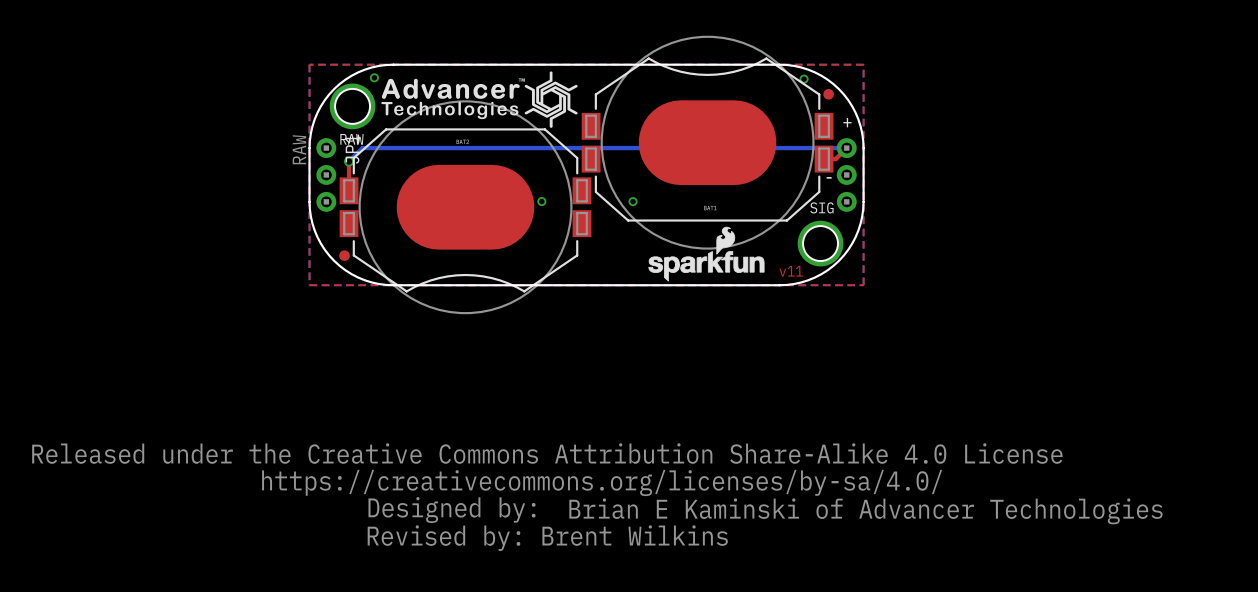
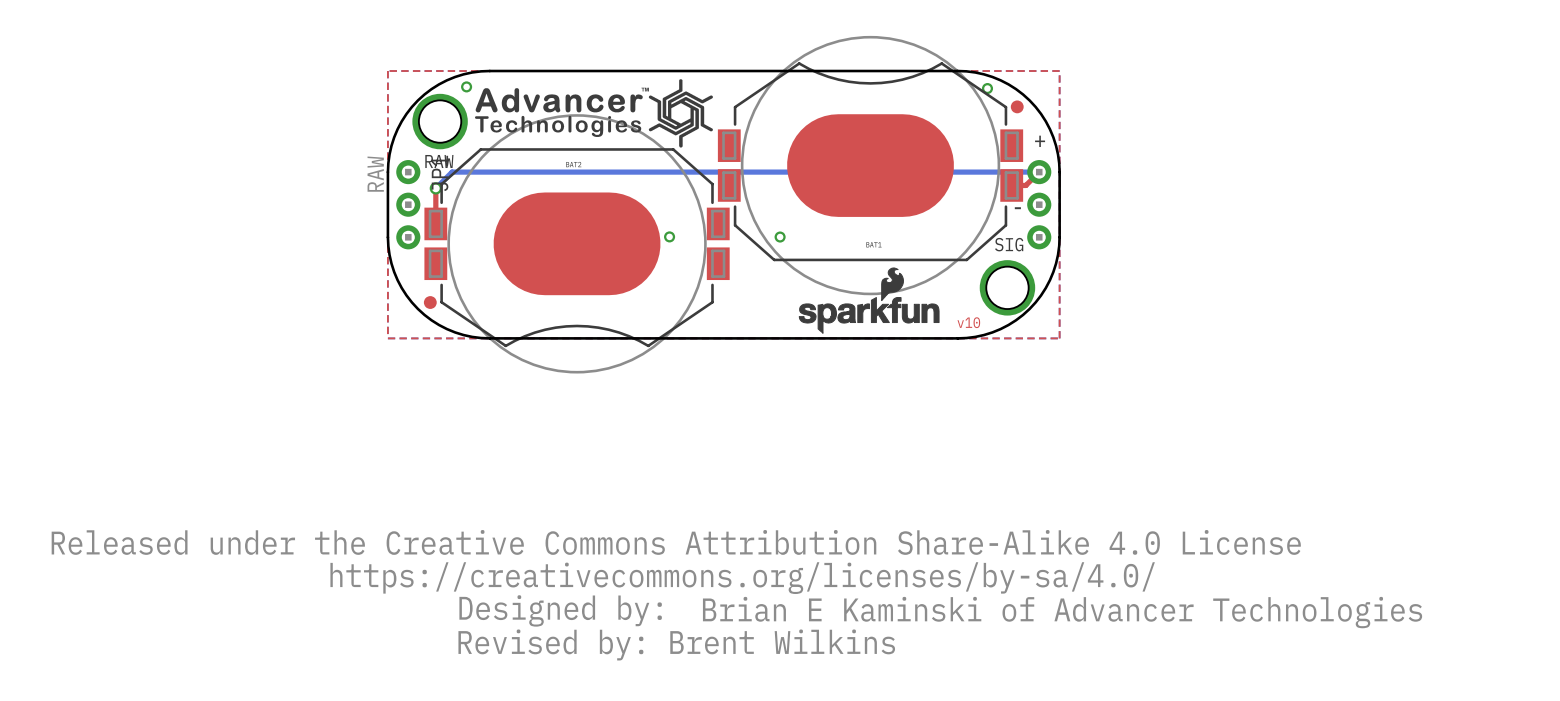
text: v11 (791, 271) -> v10 (968, 322)

